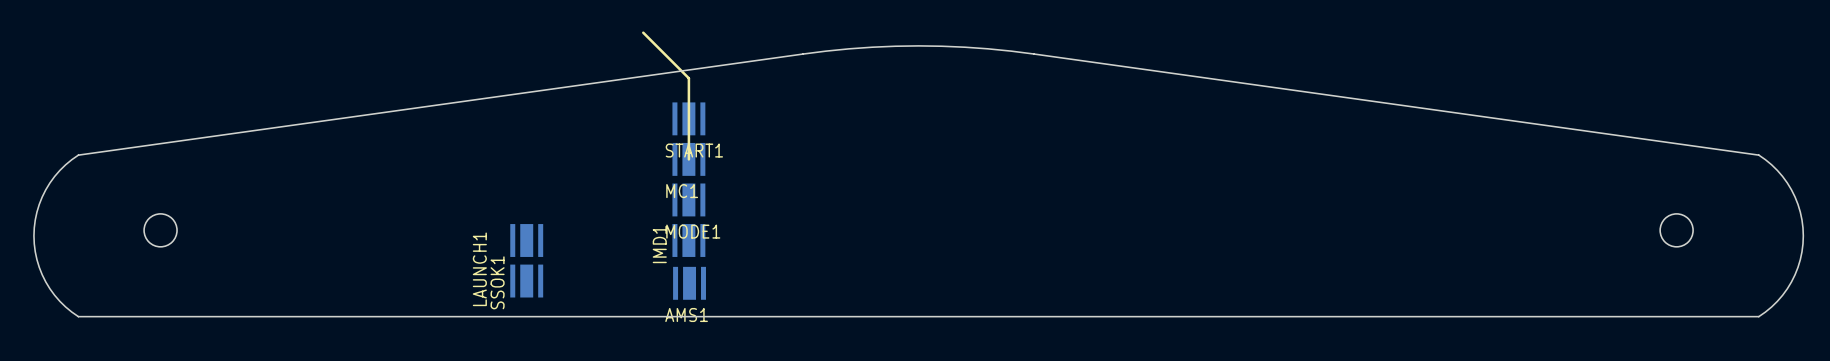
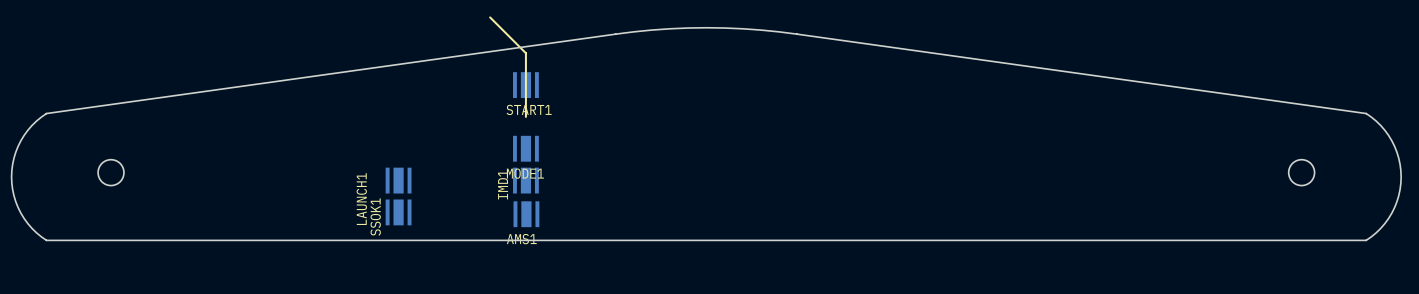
MC1: (688, 159) -> none

